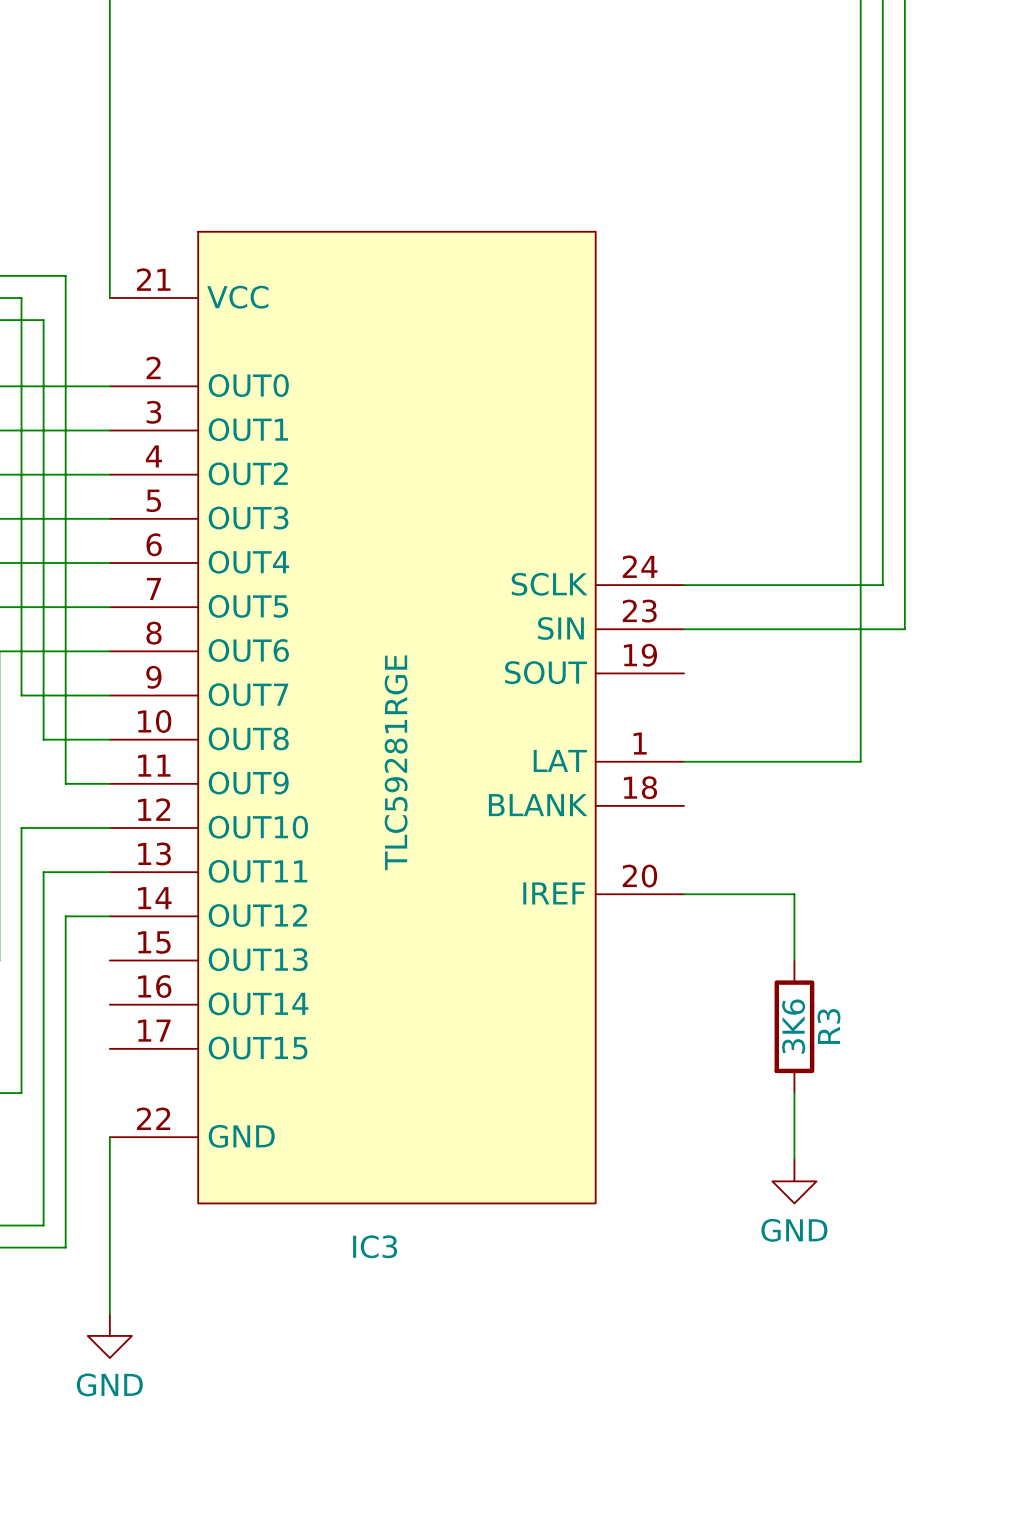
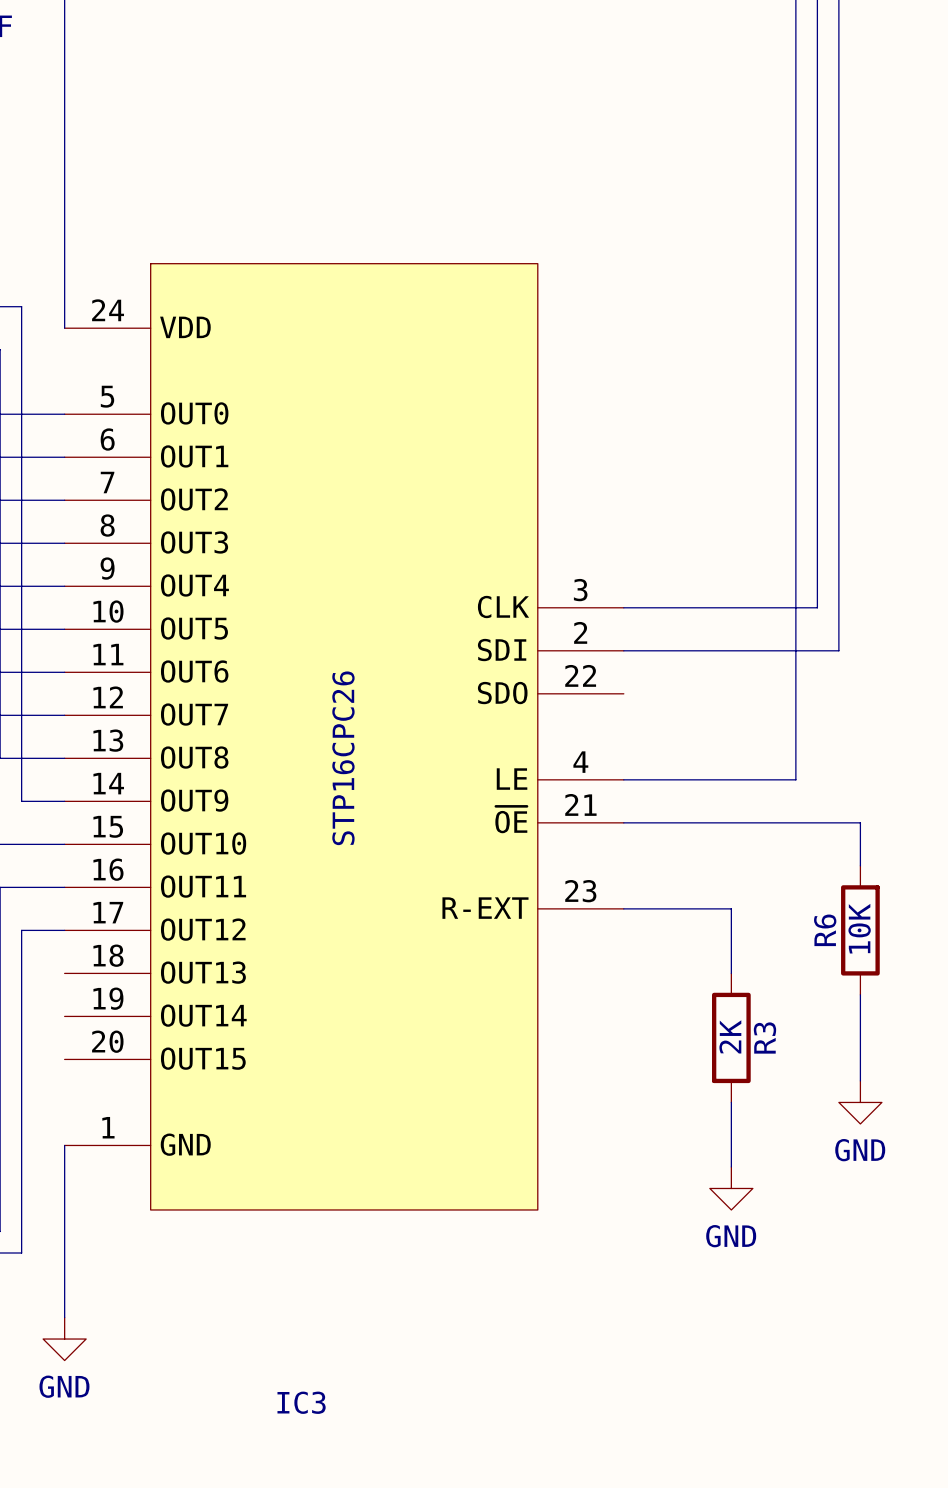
IC3 symbol: [109, 231, 685, 1204] -> [64, 263, 624, 1210]
IC3 value: TLC59281RGE (396, 762) -> STP16CPC26 (343, 758)
wire: none -> (623, 822) (860, 822) (860, 865)
R6: none -> 10K (860, 930)
wire: none -> (860, 994) (860, 1080)
R3 value: 3K6 (793, 1026) -> 2K (730, 1036)
power symbol: none -> GND (860, 1102)
IC3 name position: IC3 (375, 1246) -> IC3 (301, 1402)

